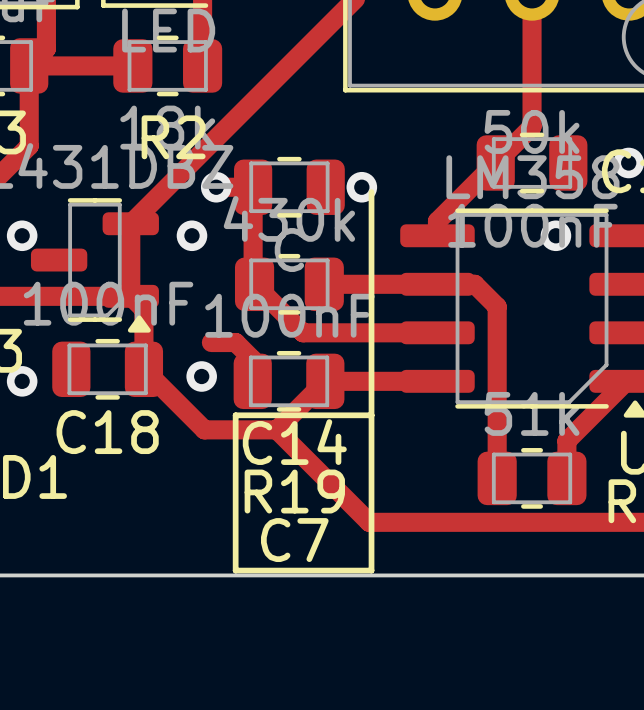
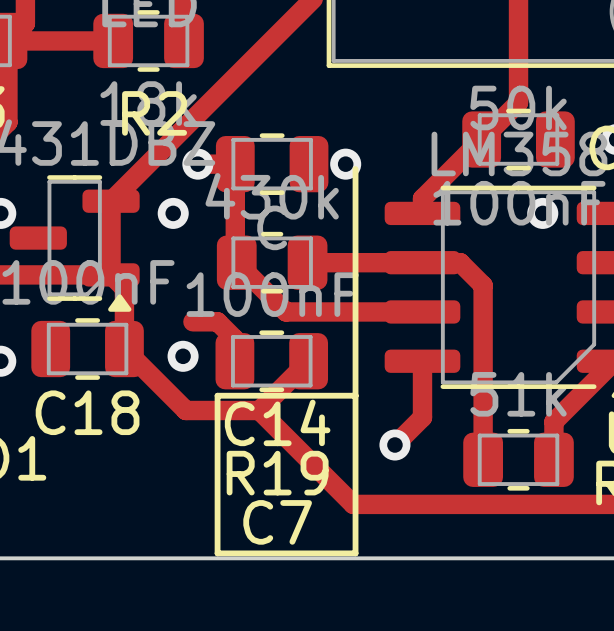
track: (325, 381) (437, 381) -> (394, 445) (422, 417) (422, 361)
via: none -> (394, 445)

